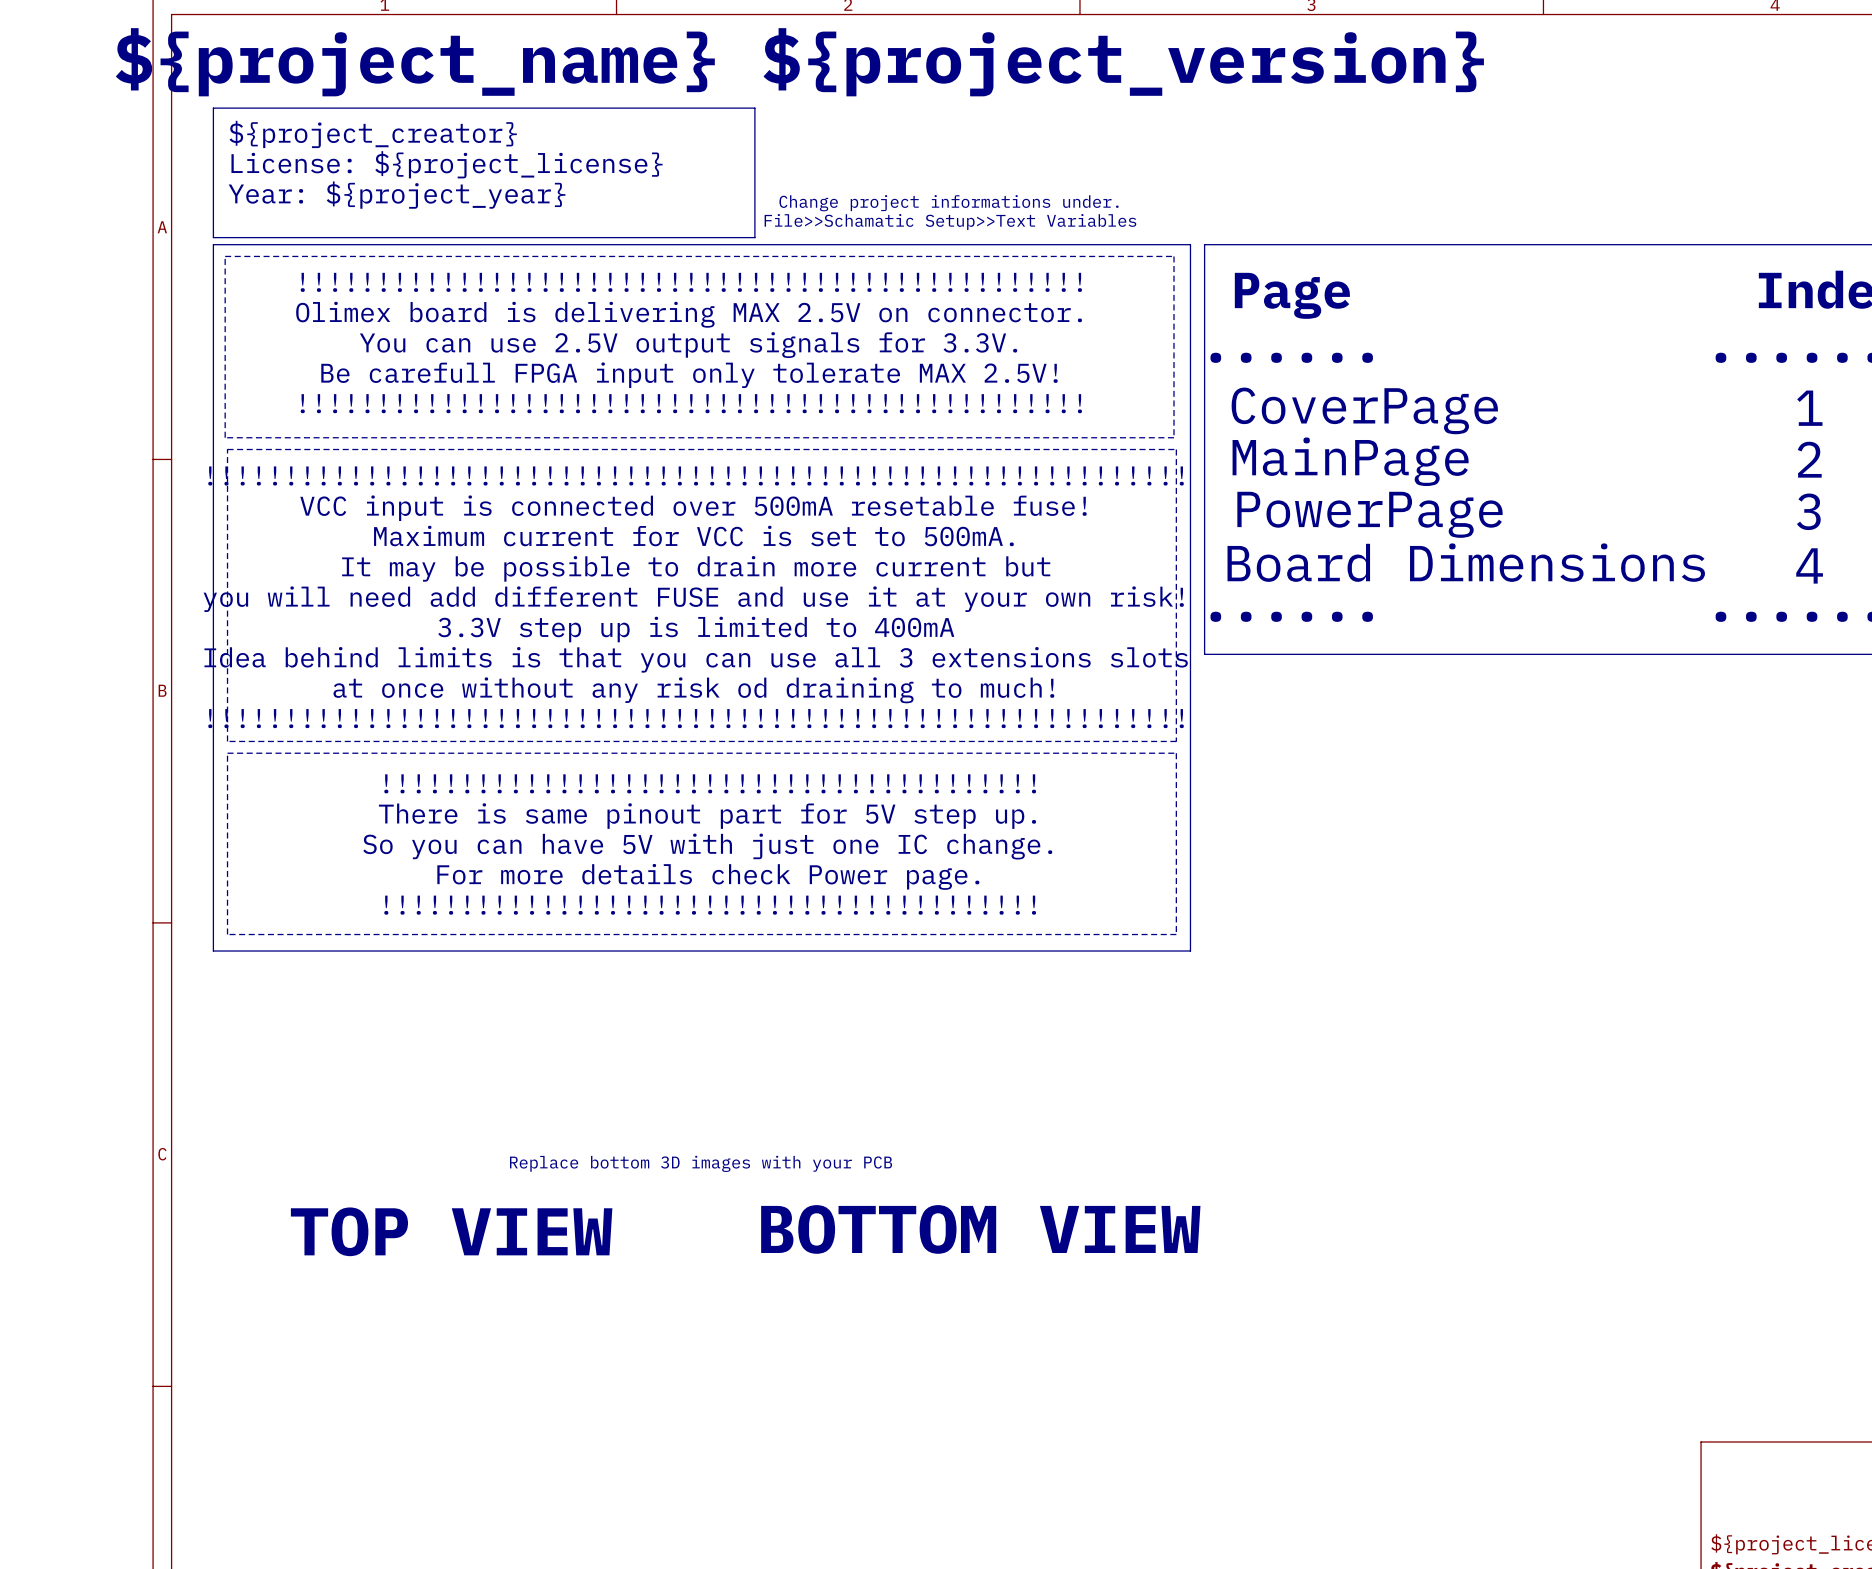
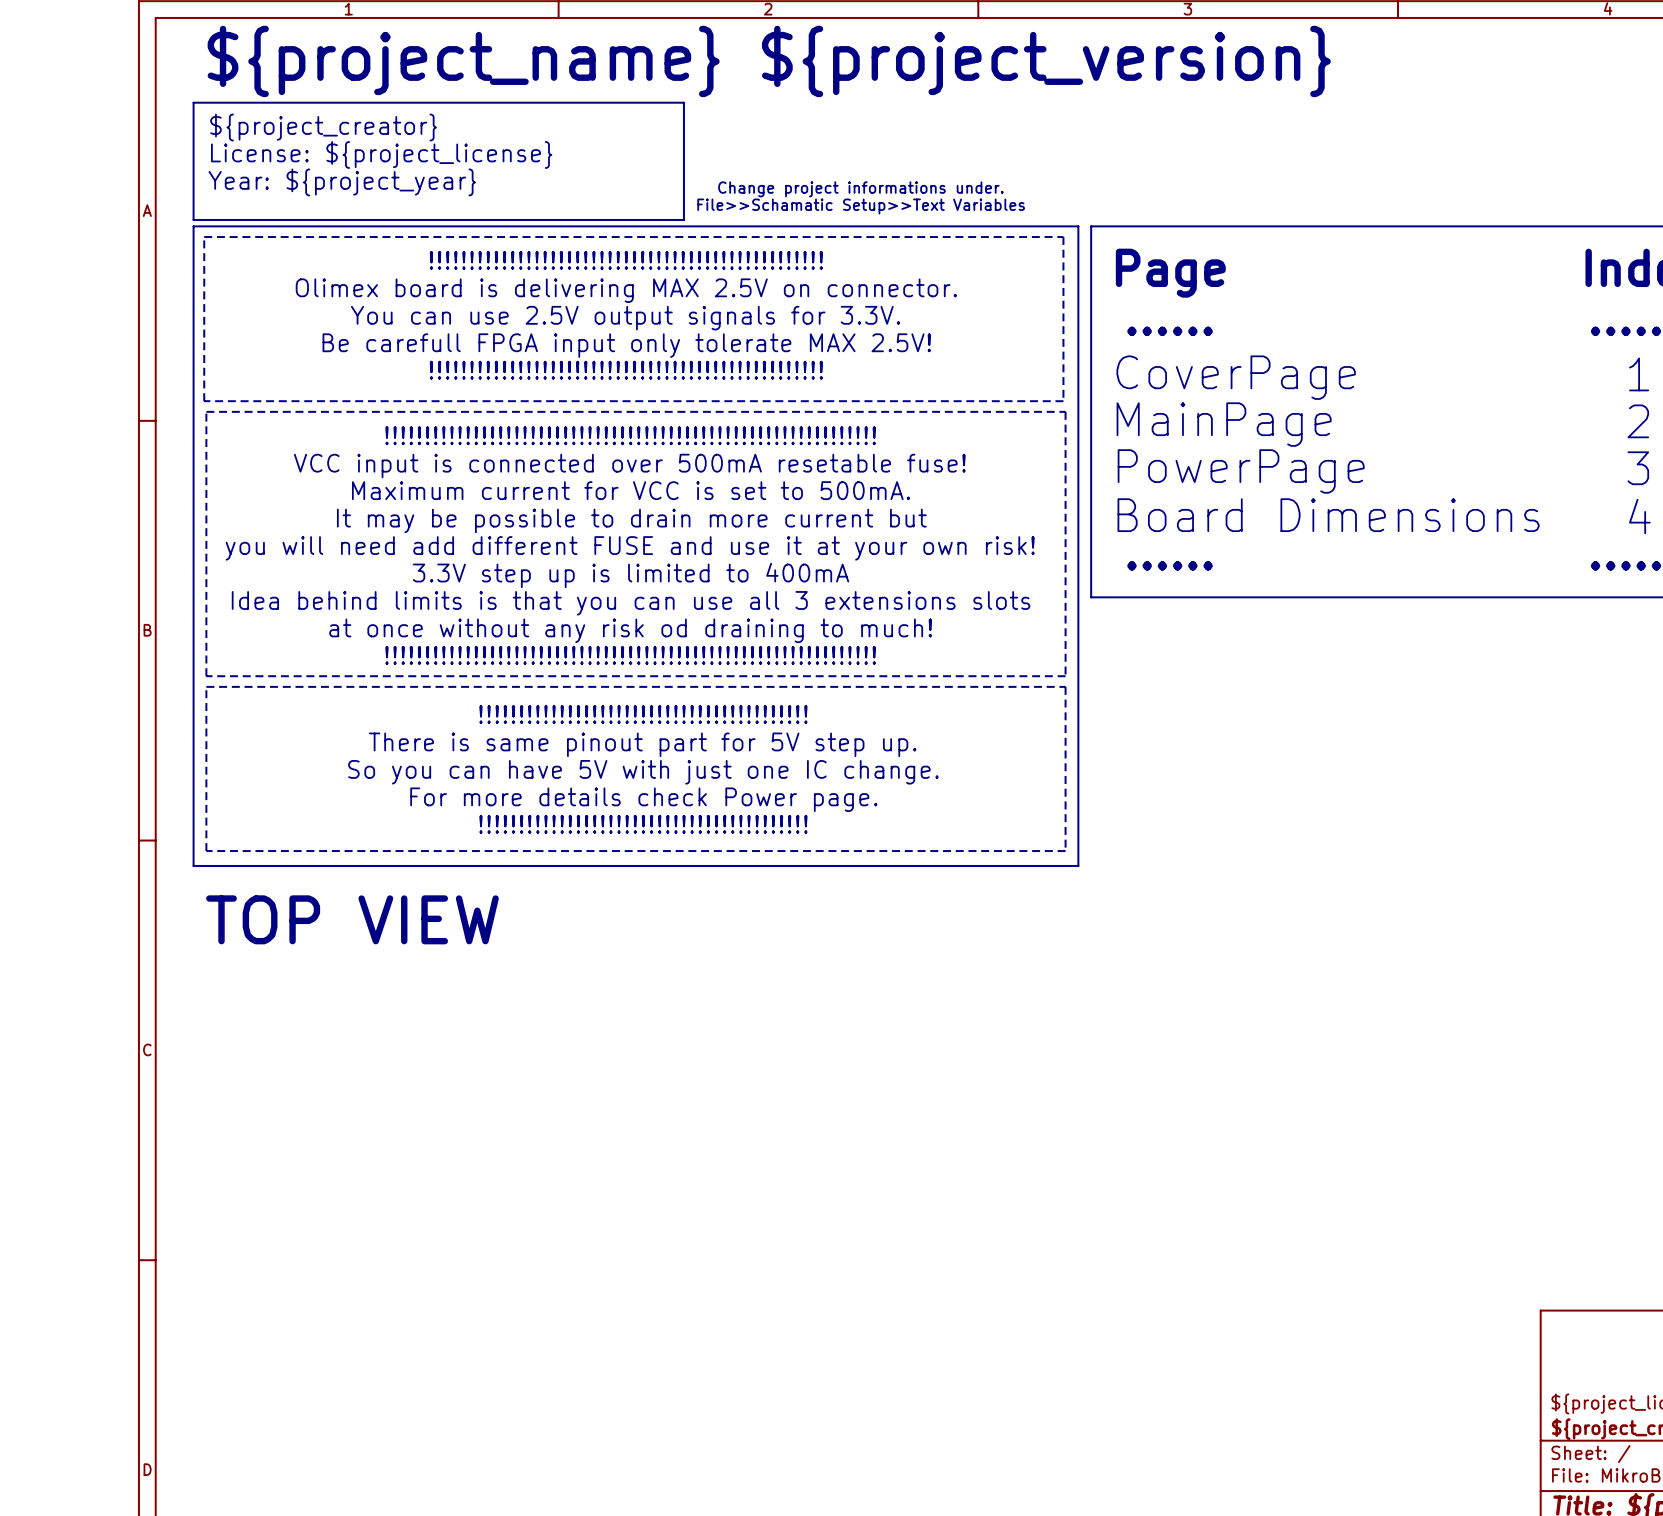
text position: ${project_name} ${project_version} (799, 62) -> ${project_name} ${project_version} (769, 61)
text: Replace bottom 3D images with your PCB (701, 1163) -> none
text: BOTTOM VIEW (980, 1229) -> none
text position: TOP VIEW (451, 1231) -> TOP VIEW (352, 919)

